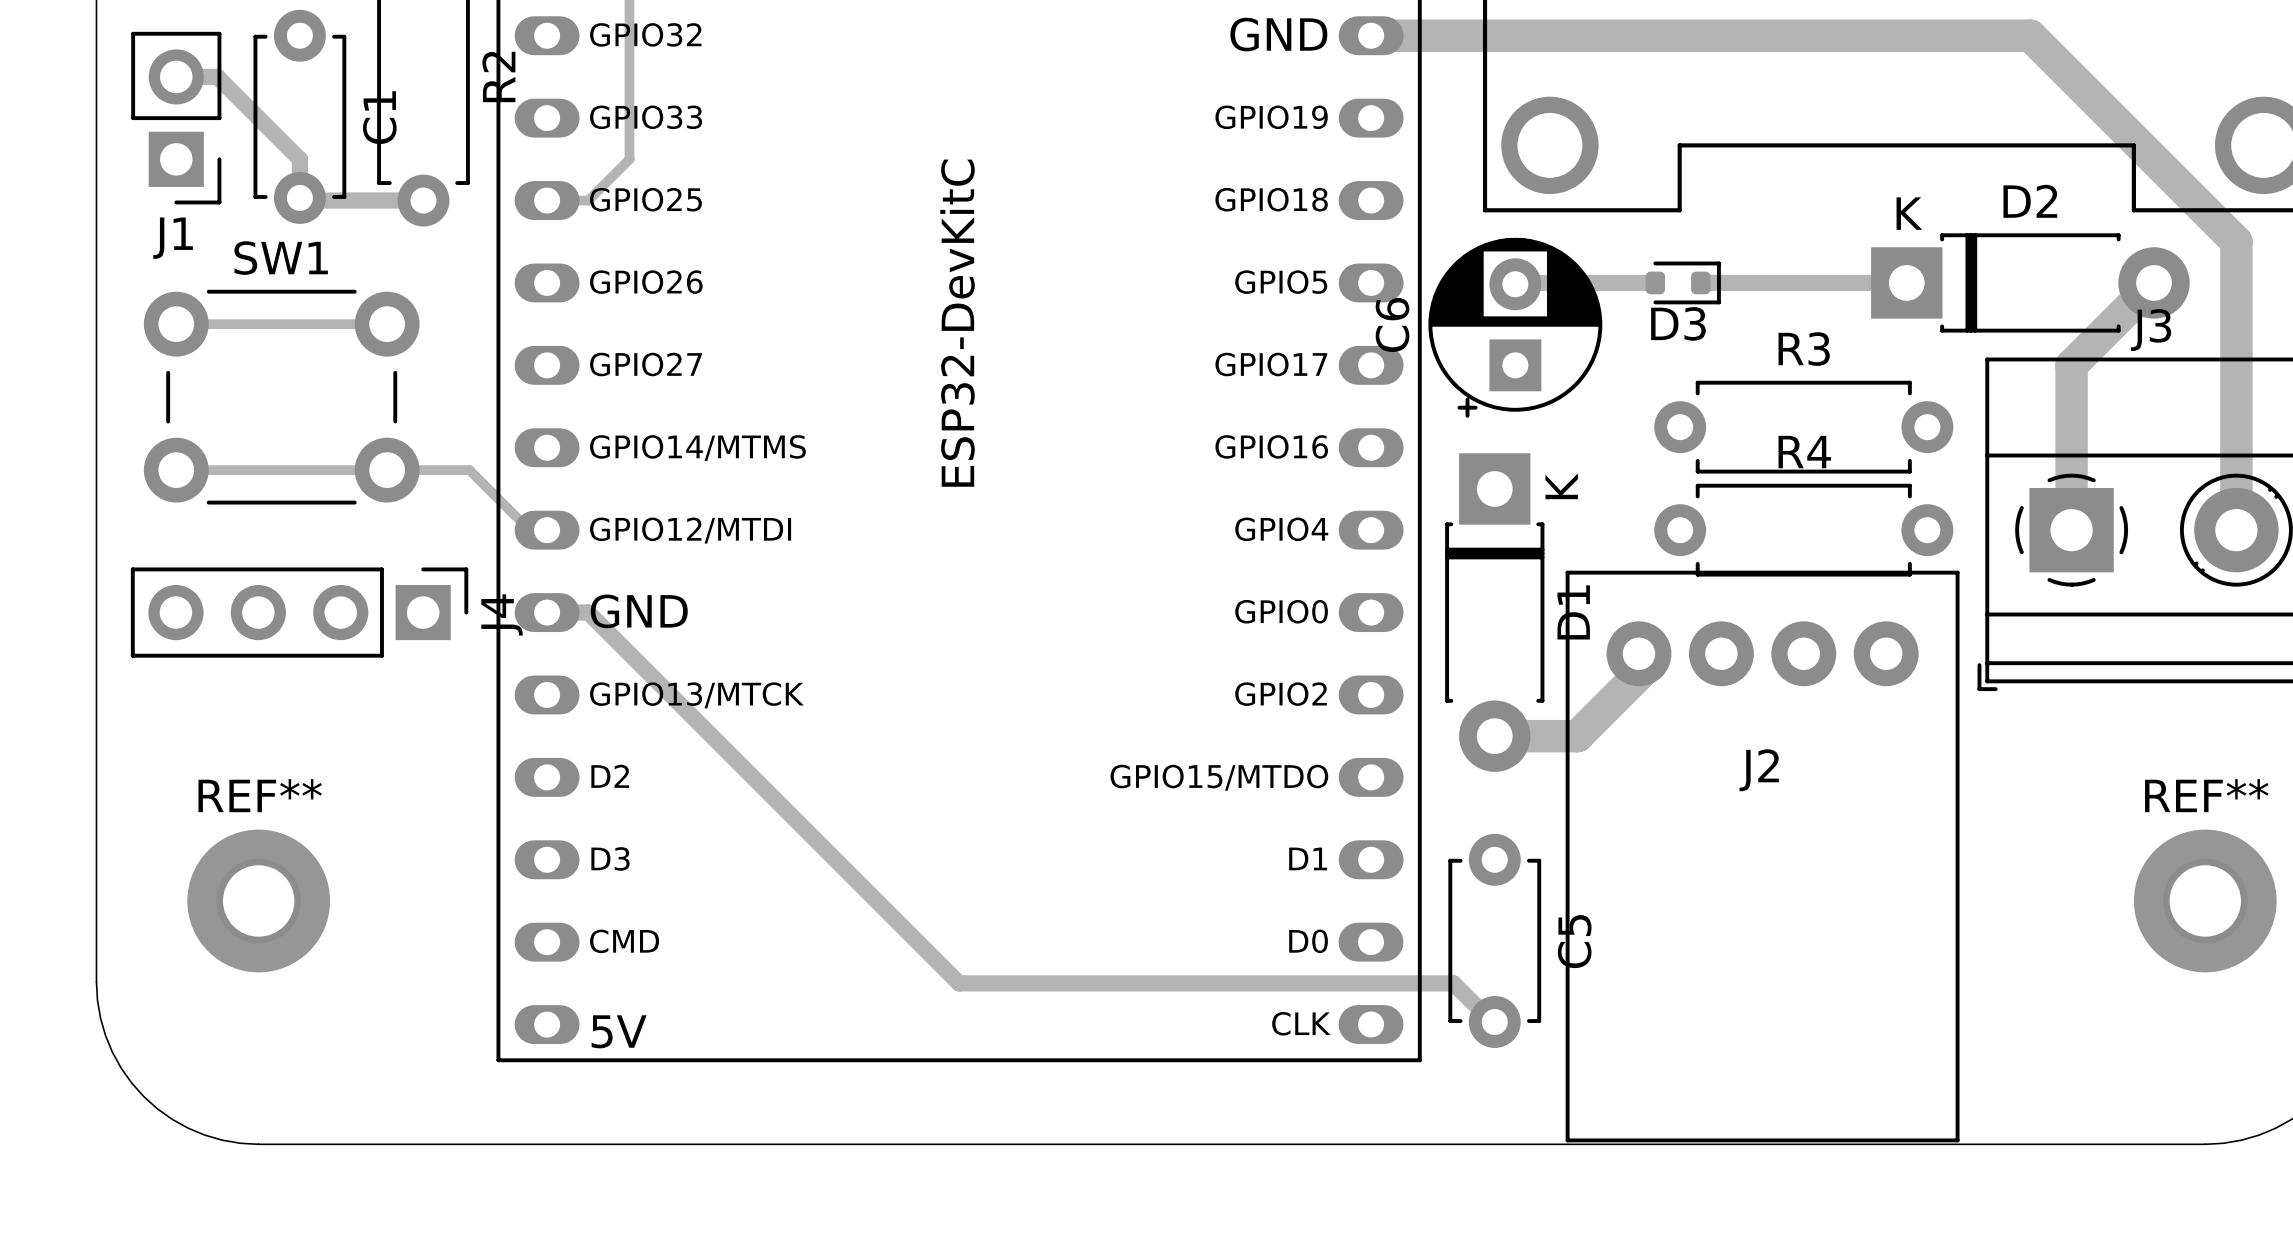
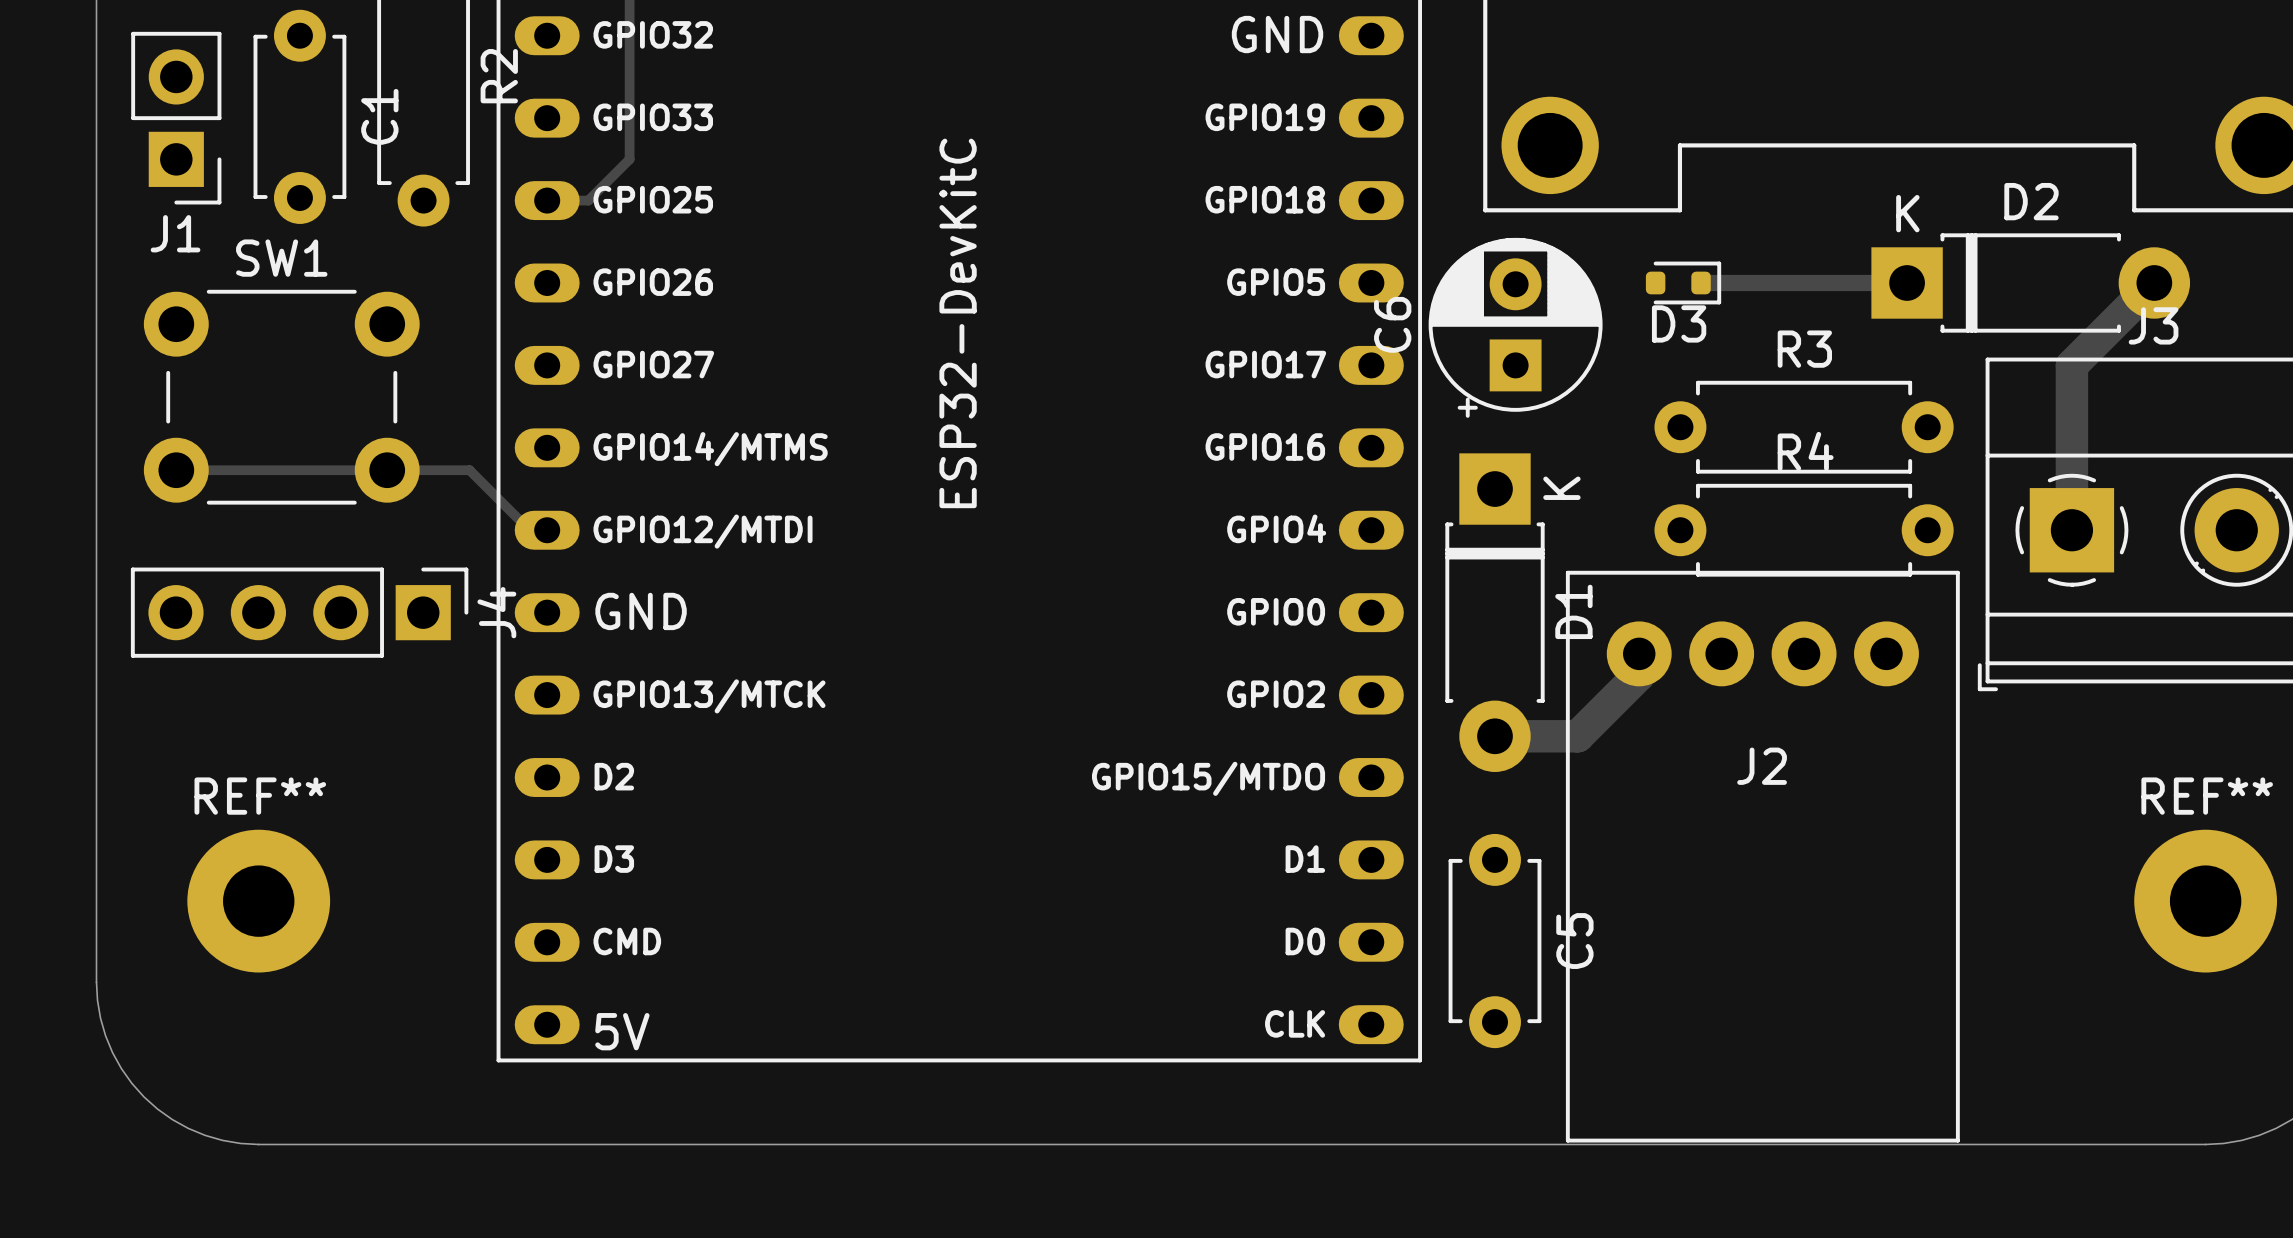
track: (1371, 35) (2030, 35) (2236, 241) (2236, 530) -> none
track: (176, 76) (217, 76) (299, 159) (299, 197) (302, 200) (423, 200) -> none
track: (1655, 282) (1515, 284) -> none
track: (176, 324) (387, 324) -> none
track: (547, 612) (588, 612) (959, 983) (1453, 983) (1492, 1021) (1494, 1021) -> none

